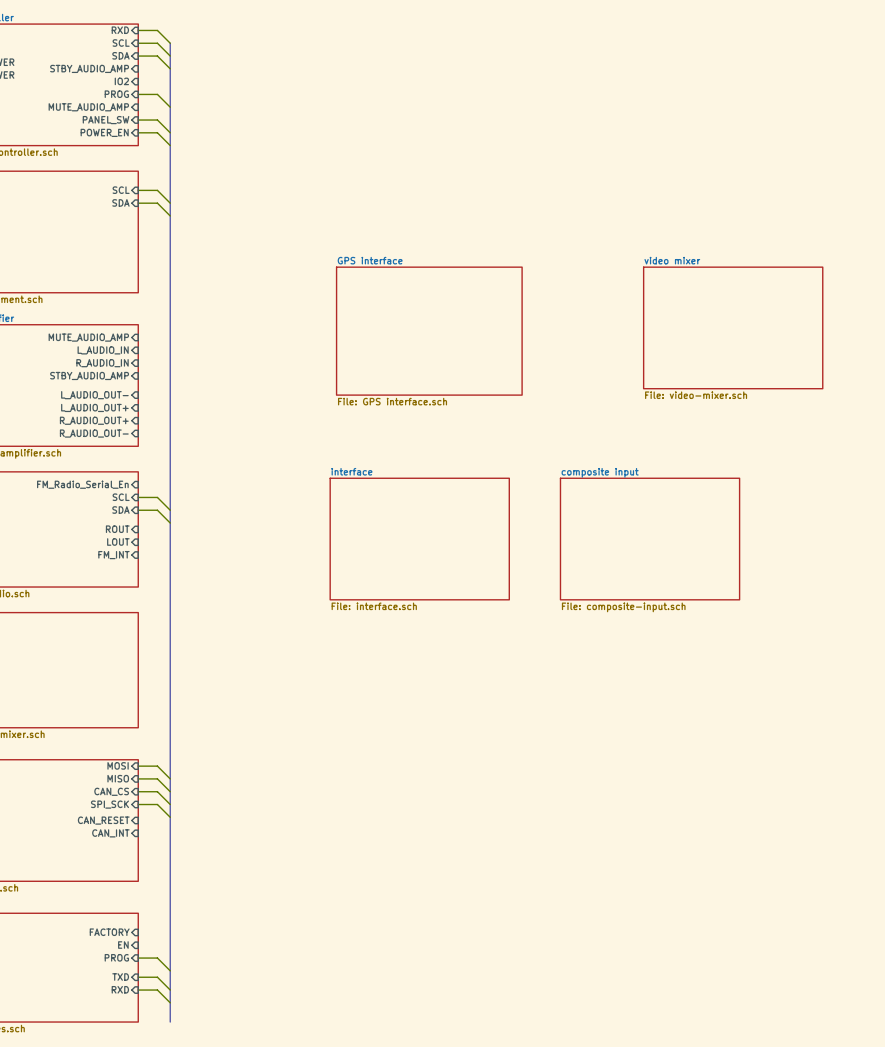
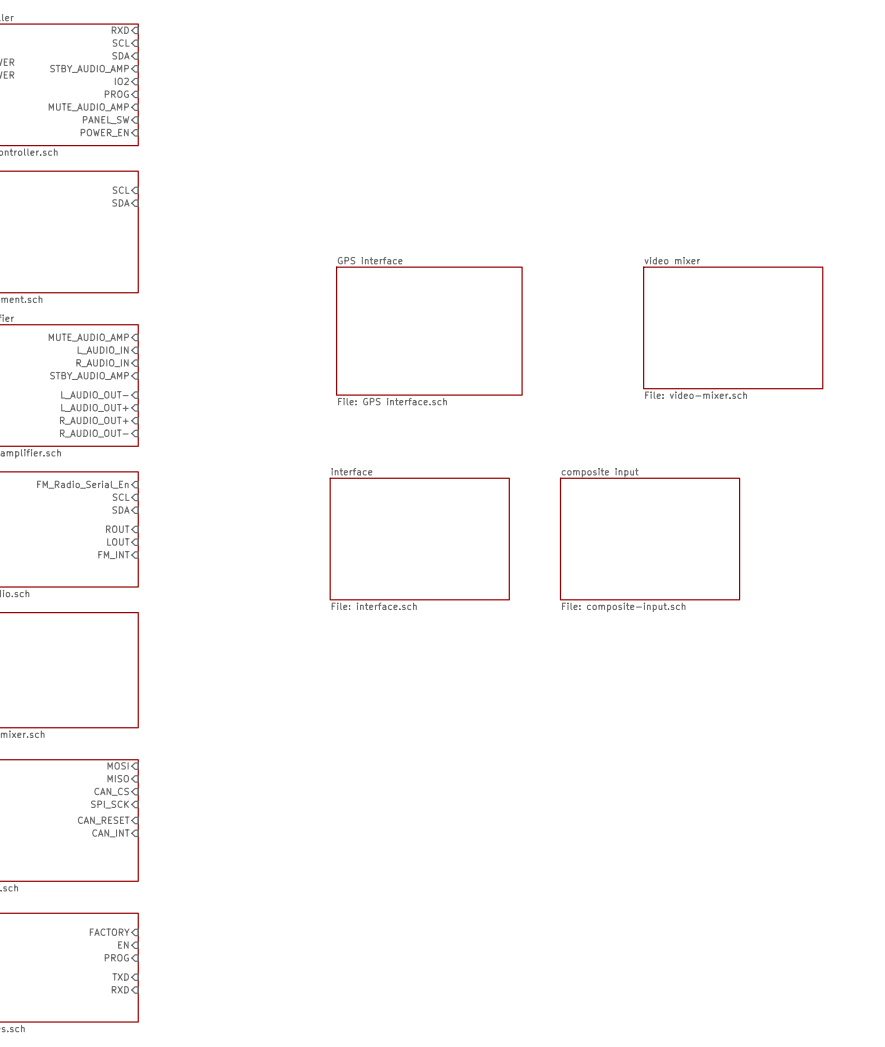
wire: (138, 30) (157, 30) (170, 43) -> none
wire: (138, 43) (157, 43) (170, 56) -> none
bus: (170, 43) (170, 1022) -> none
wire: (138, 56) (157, 56) (170, 68) -> none
wire: (138, 94) (157, 94) (170, 107) -> none
wire: (138, 120) (157, 120) (170, 132) -> none
wire: (138, 132) (157, 132) (170, 145) -> none
wire: (138, 190) (157, 190) (170, 203) -> none
wire: (138, 203) (157, 203) (170, 215) -> none
wire: (138, 497) (157, 497) (170, 510) -> none
wire: (138, 510) (157, 510) (170, 523) -> none
wire: (138, 766) (157, 766) (170, 778) -> none
wire: (138, 778) (157, 778) (170, 791) -> none
wire: (138, 791) (157, 791) (170, 804) -> none
wire: (138, 804) (157, 804) (170, 817) -> none
wire: (138, 958) (157, 958) (170, 970) -> none
wire: (138, 977) (157, 977) (170, 990) -> none
wire: (138, 990) (157, 990) (170, 1002) -> none

